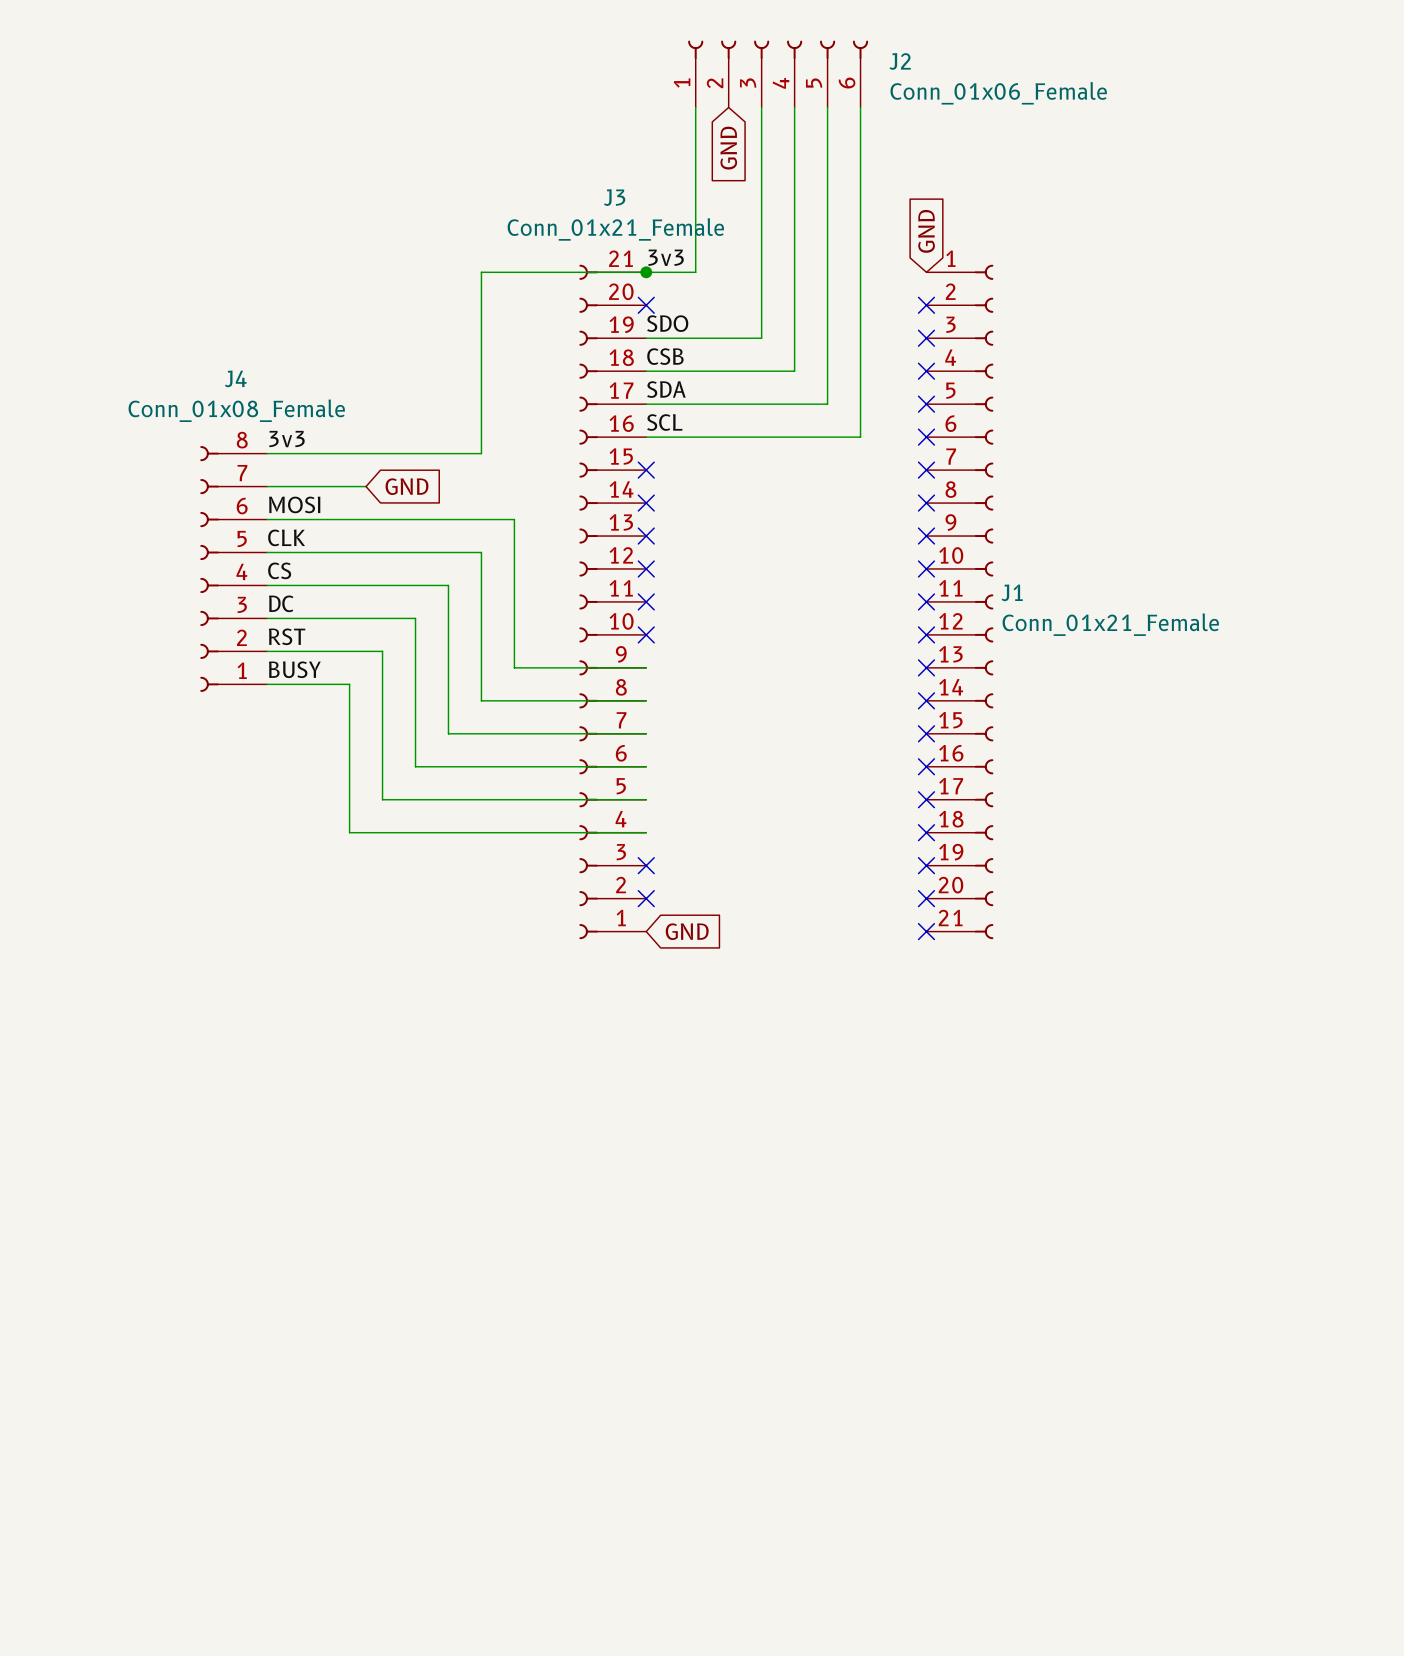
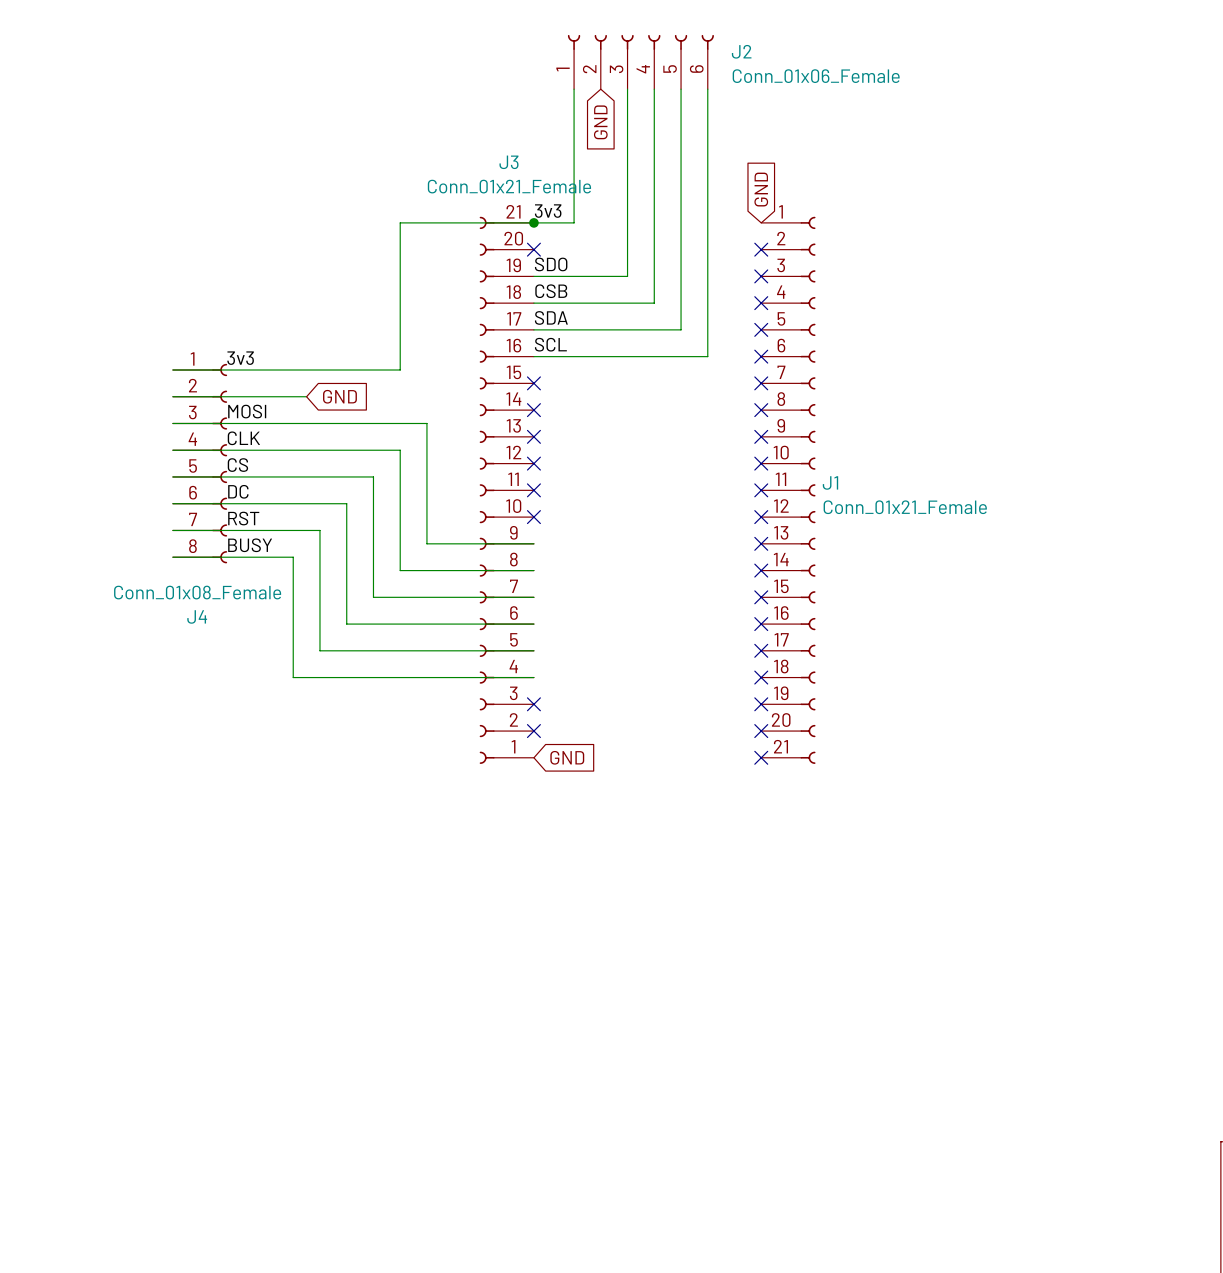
J4 rotation: 0° (209, 568) -> 180° (219, 463)

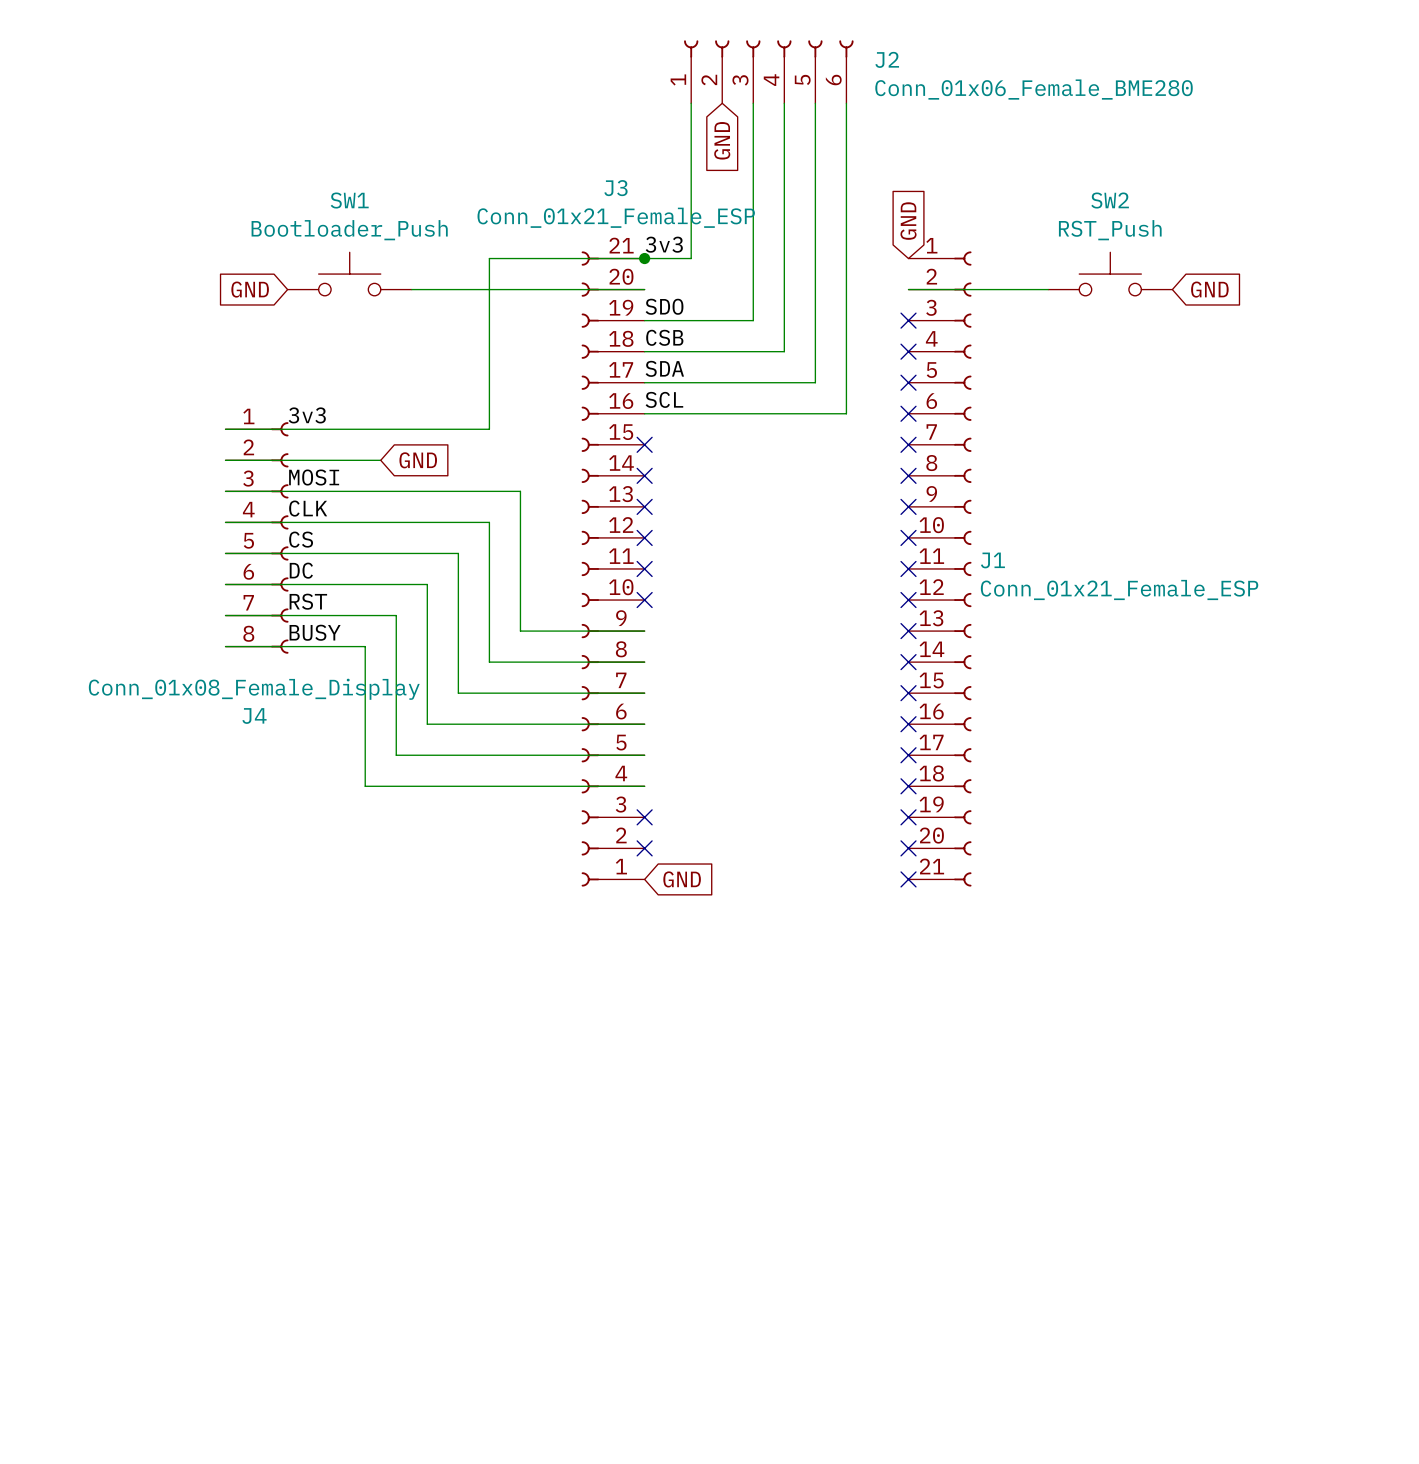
J2 value: Conn_01x06_Female (816, 76) -> Conn_01x06_Female_BME280 (1034, 89)
J3 value: Conn_01x21_Female (509, 186) -> Conn_01x21_Female_ESP (616, 217)
SW1: none -> Bootloader_Push (349, 274)
SW2: none -> RST_Push (1110, 274)
global label: none -> GND (250, 289)
wire: none -> (411, 289) (644, 289)
no-connect mark: (533, 249) -> none
wire: none -> (908, 289) (1048, 289)
no-connect mark: (761, 249) -> none
global label: none -> GND (1209, 289)
J1 value: Conn_01x21_Female (905, 507) -> Conn_01x21_Female_ESP (1119, 589)
J4 value: Conn_01x08_Female (197, 592) -> Conn_01x08_Female_Display (254, 689)

